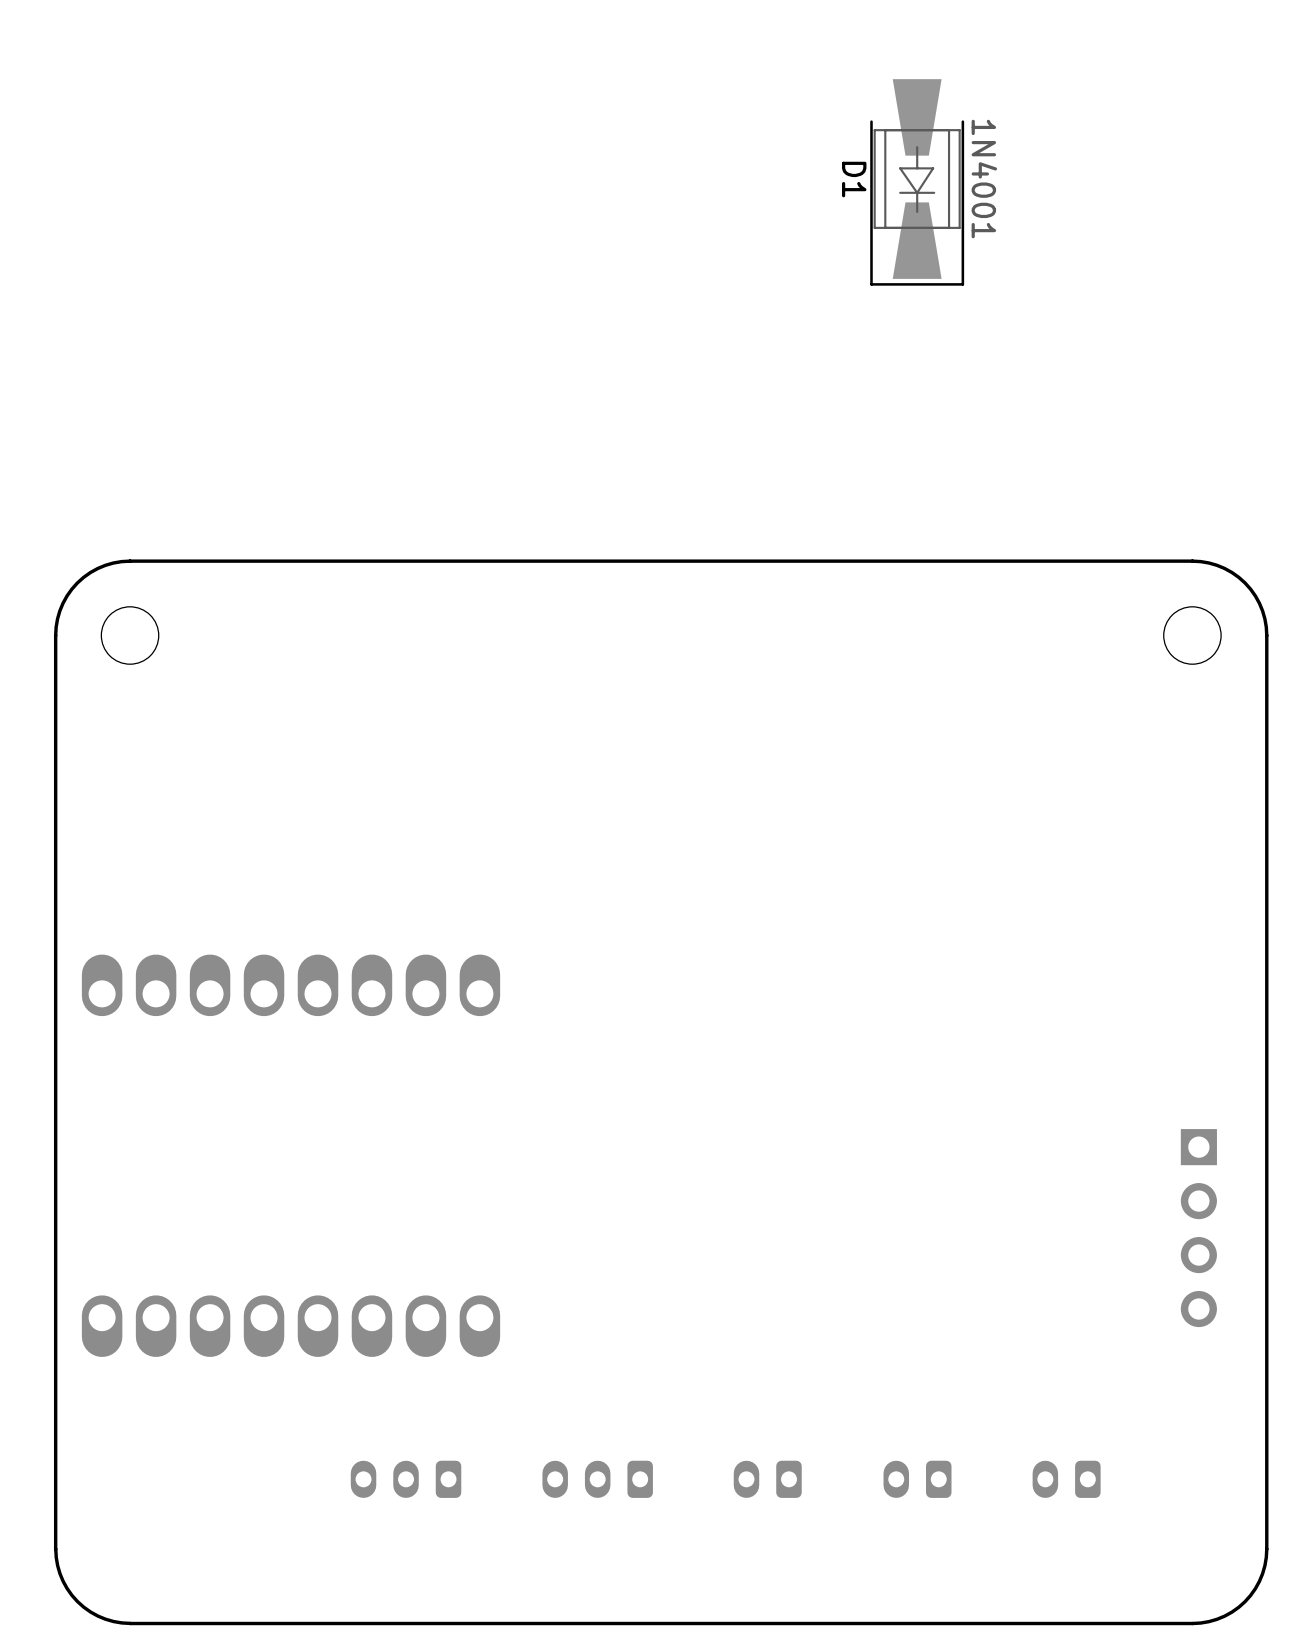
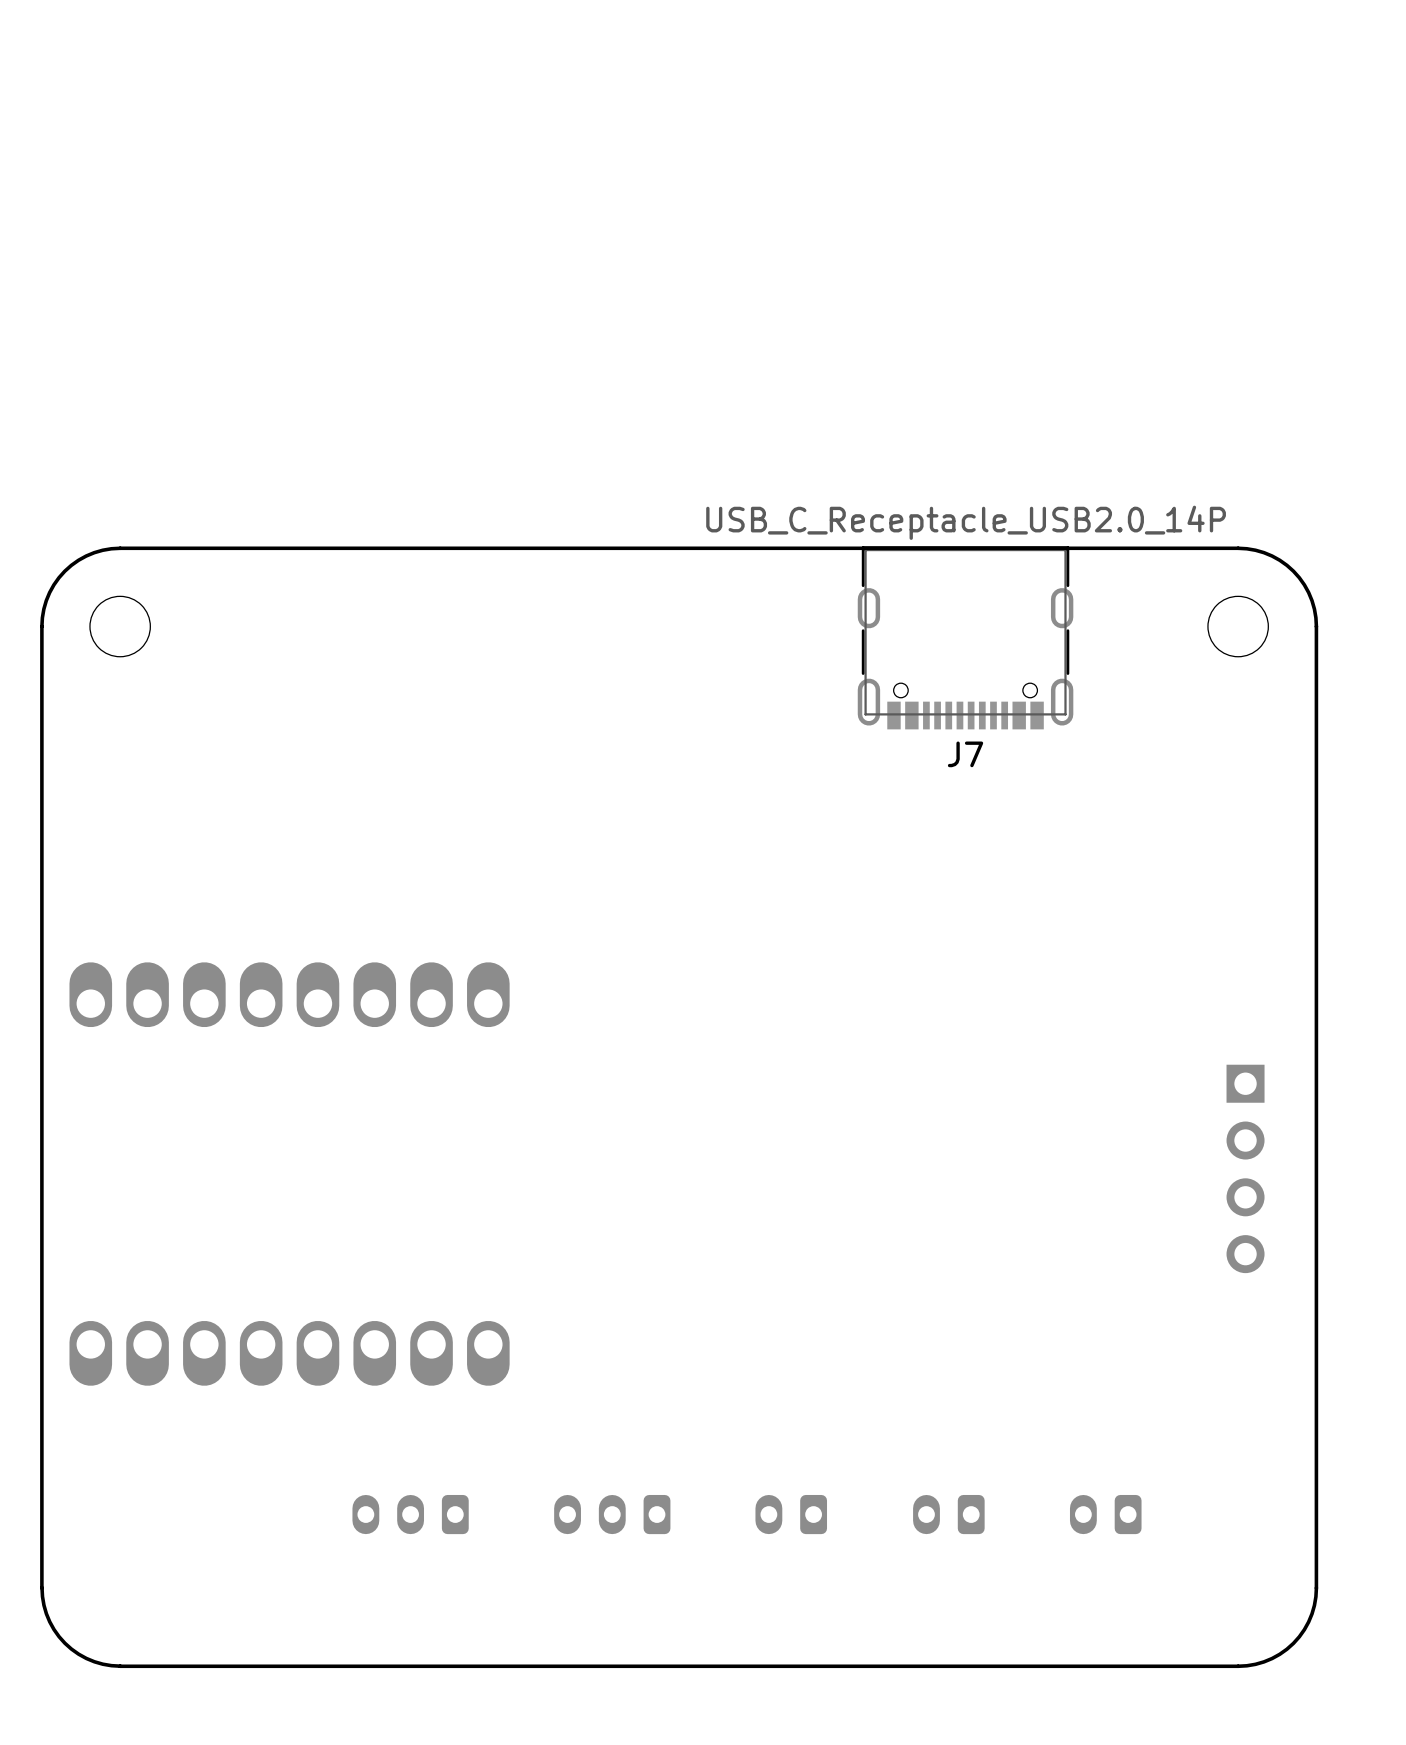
D1: 1N4001 (917, 182) -> none
J7: none -> USB_C_Receptacle_USB2.0_14P (965, 637)
part position: (1198, 1228) -> (1245, 1168)

